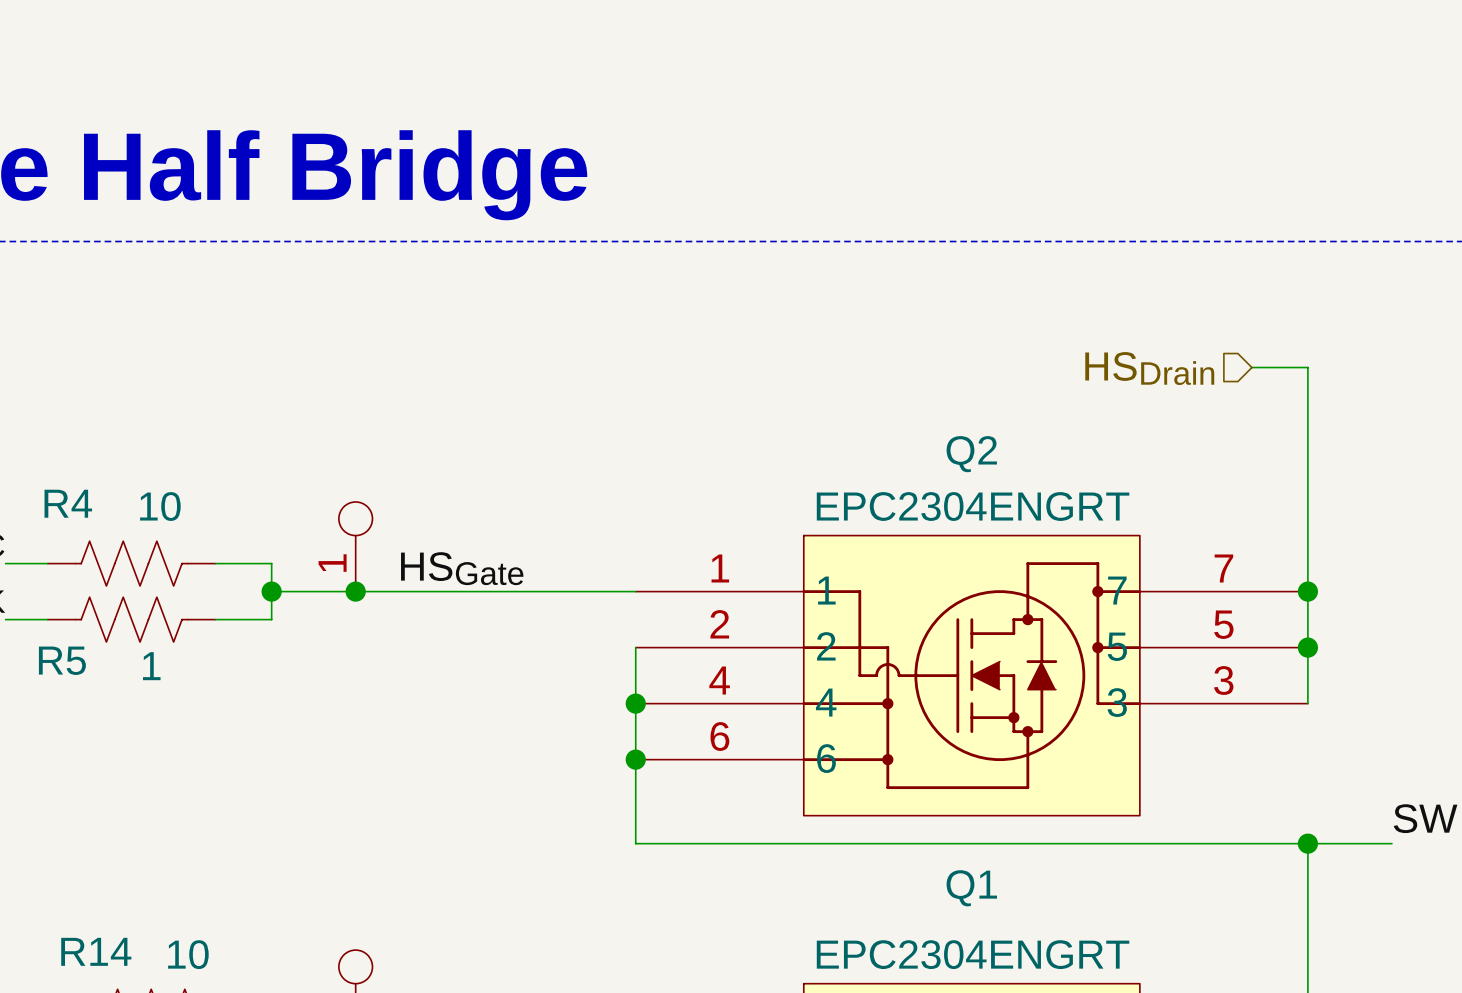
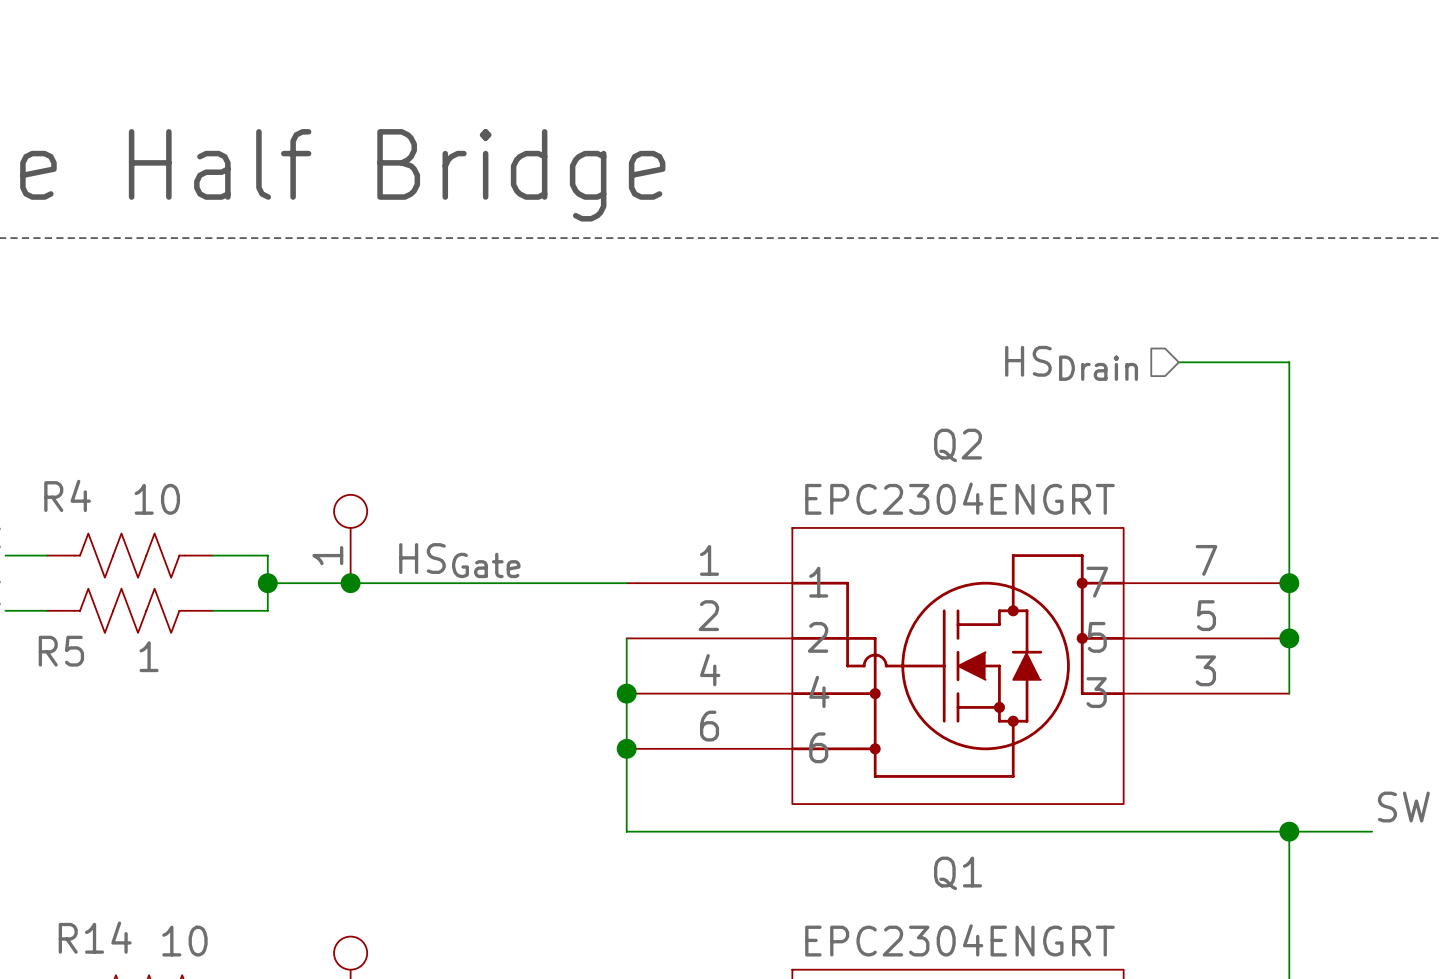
wire: none -> (1178, 362) (1234, 362)
hierarchical label position: HSDrain (1149, 368) -> HSDrain (1071, 363)

